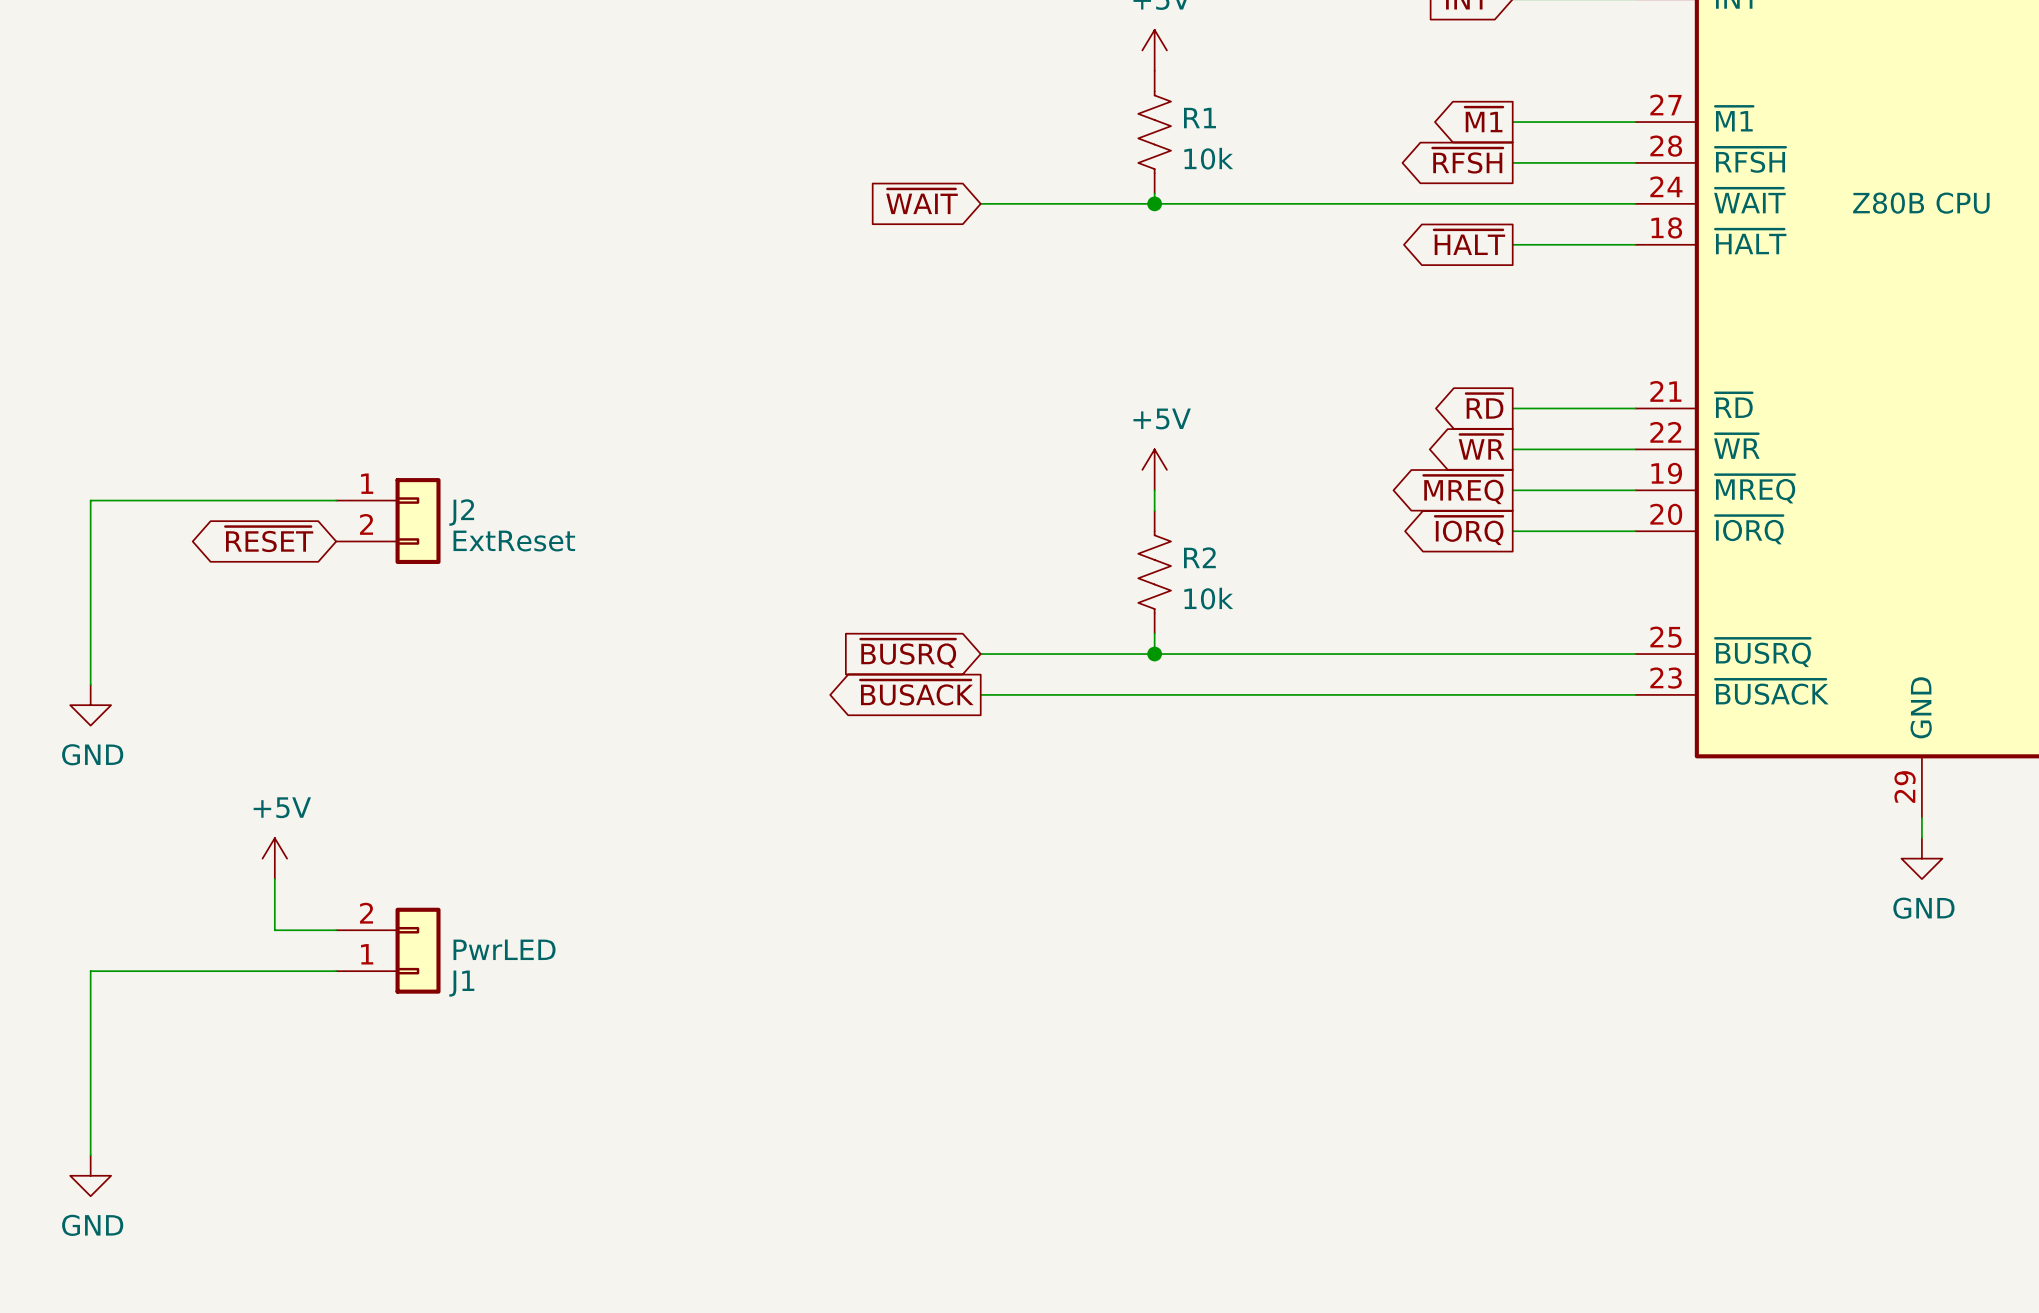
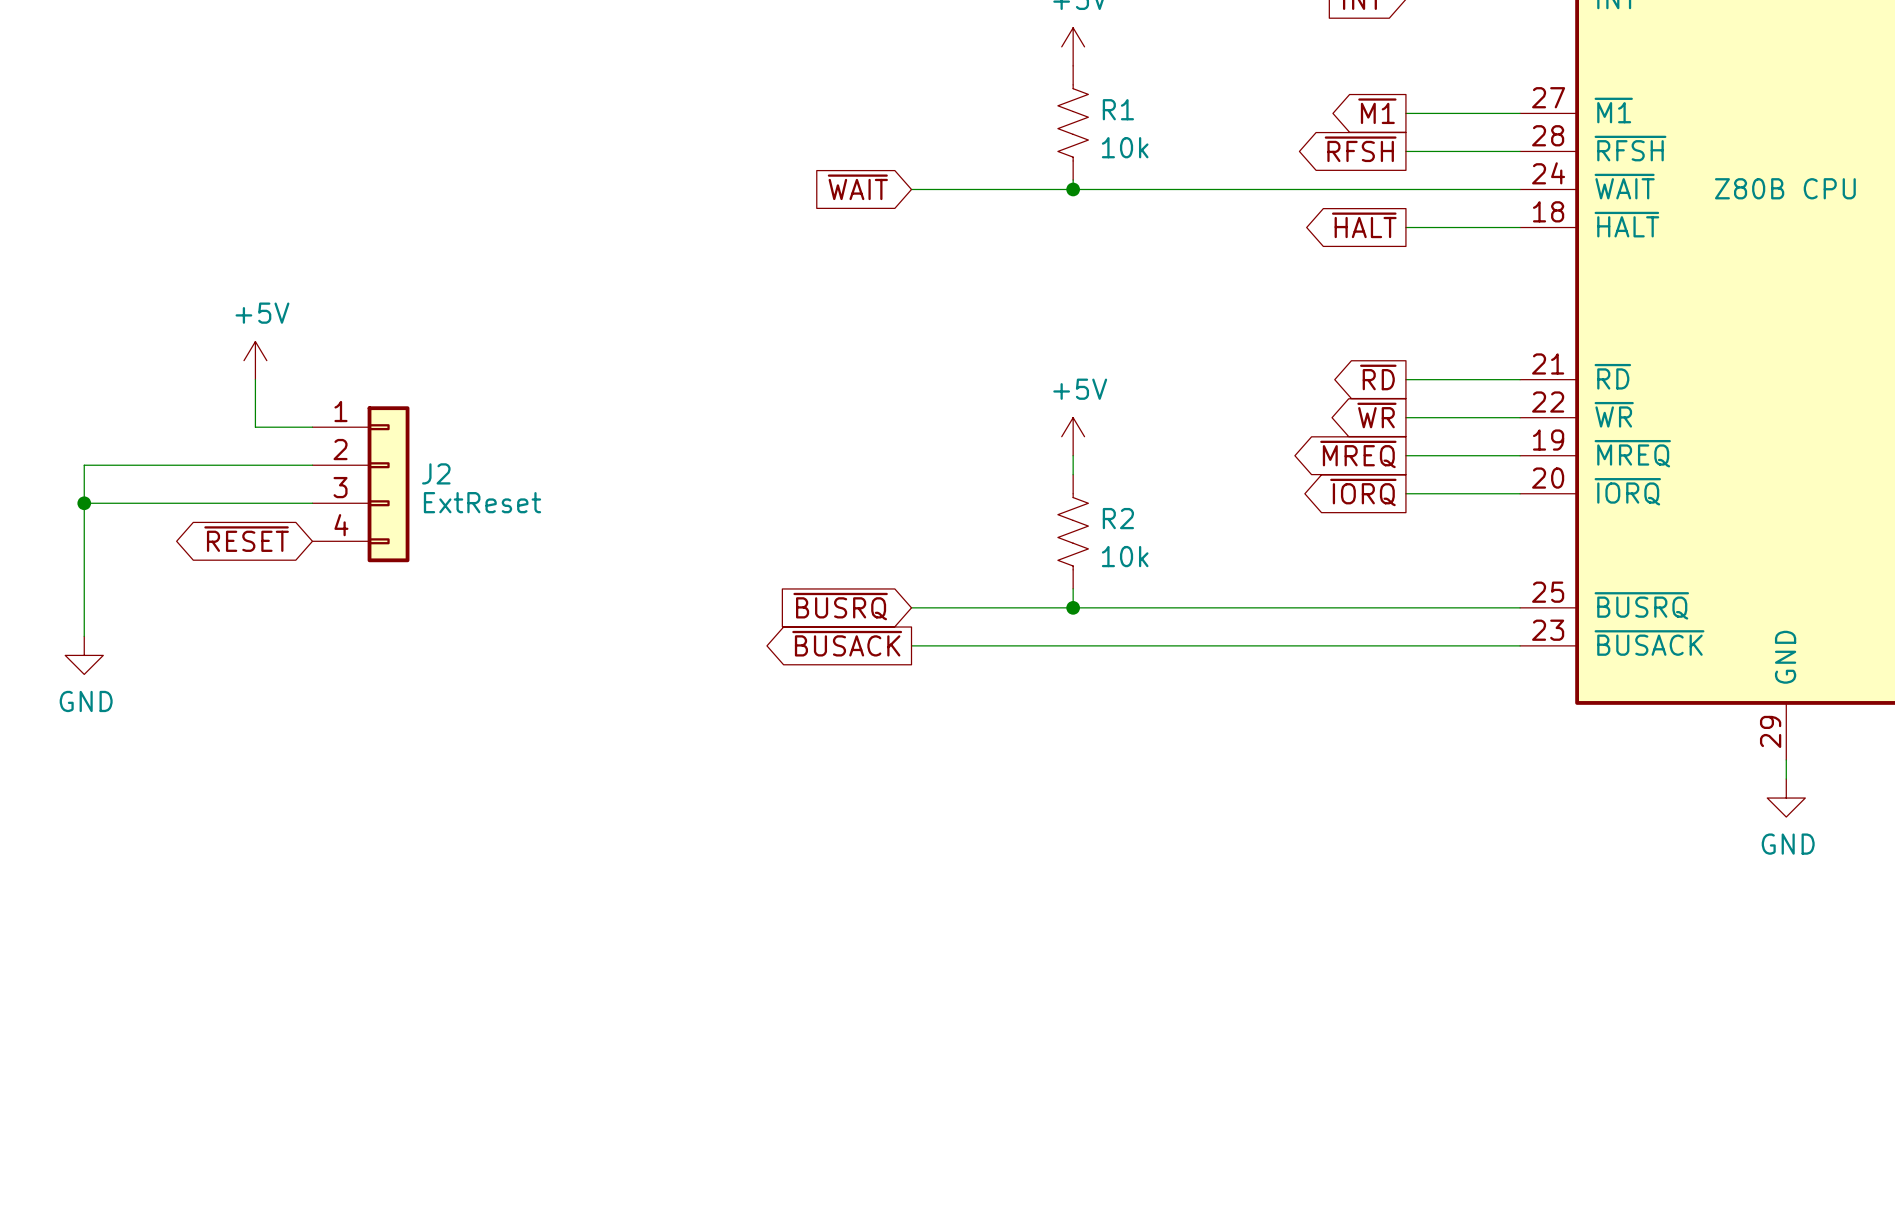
power symbol: none -> +5V (255, 360)
wire: none -> (255, 379) (255, 427) (312, 427)
J2 symbol: [336, 478, 441, 564] -> [312, 406, 410, 563]
global label position: ~{RESET} (269, 539) -> ~{RESET} (246, 539)
wire: none -> (84, 503) (312, 503)
junction: none -> (84, 503)
power symbol: +5V (274, 858) -> none
wire: (274, 879) (274, 930) (336, 930) -> none
J1: PwrLED (388, 950) -> none
wire: (336, 971) (90, 971) (90, 1155) -> none
power symbol: GND (90, 1175) -> none

